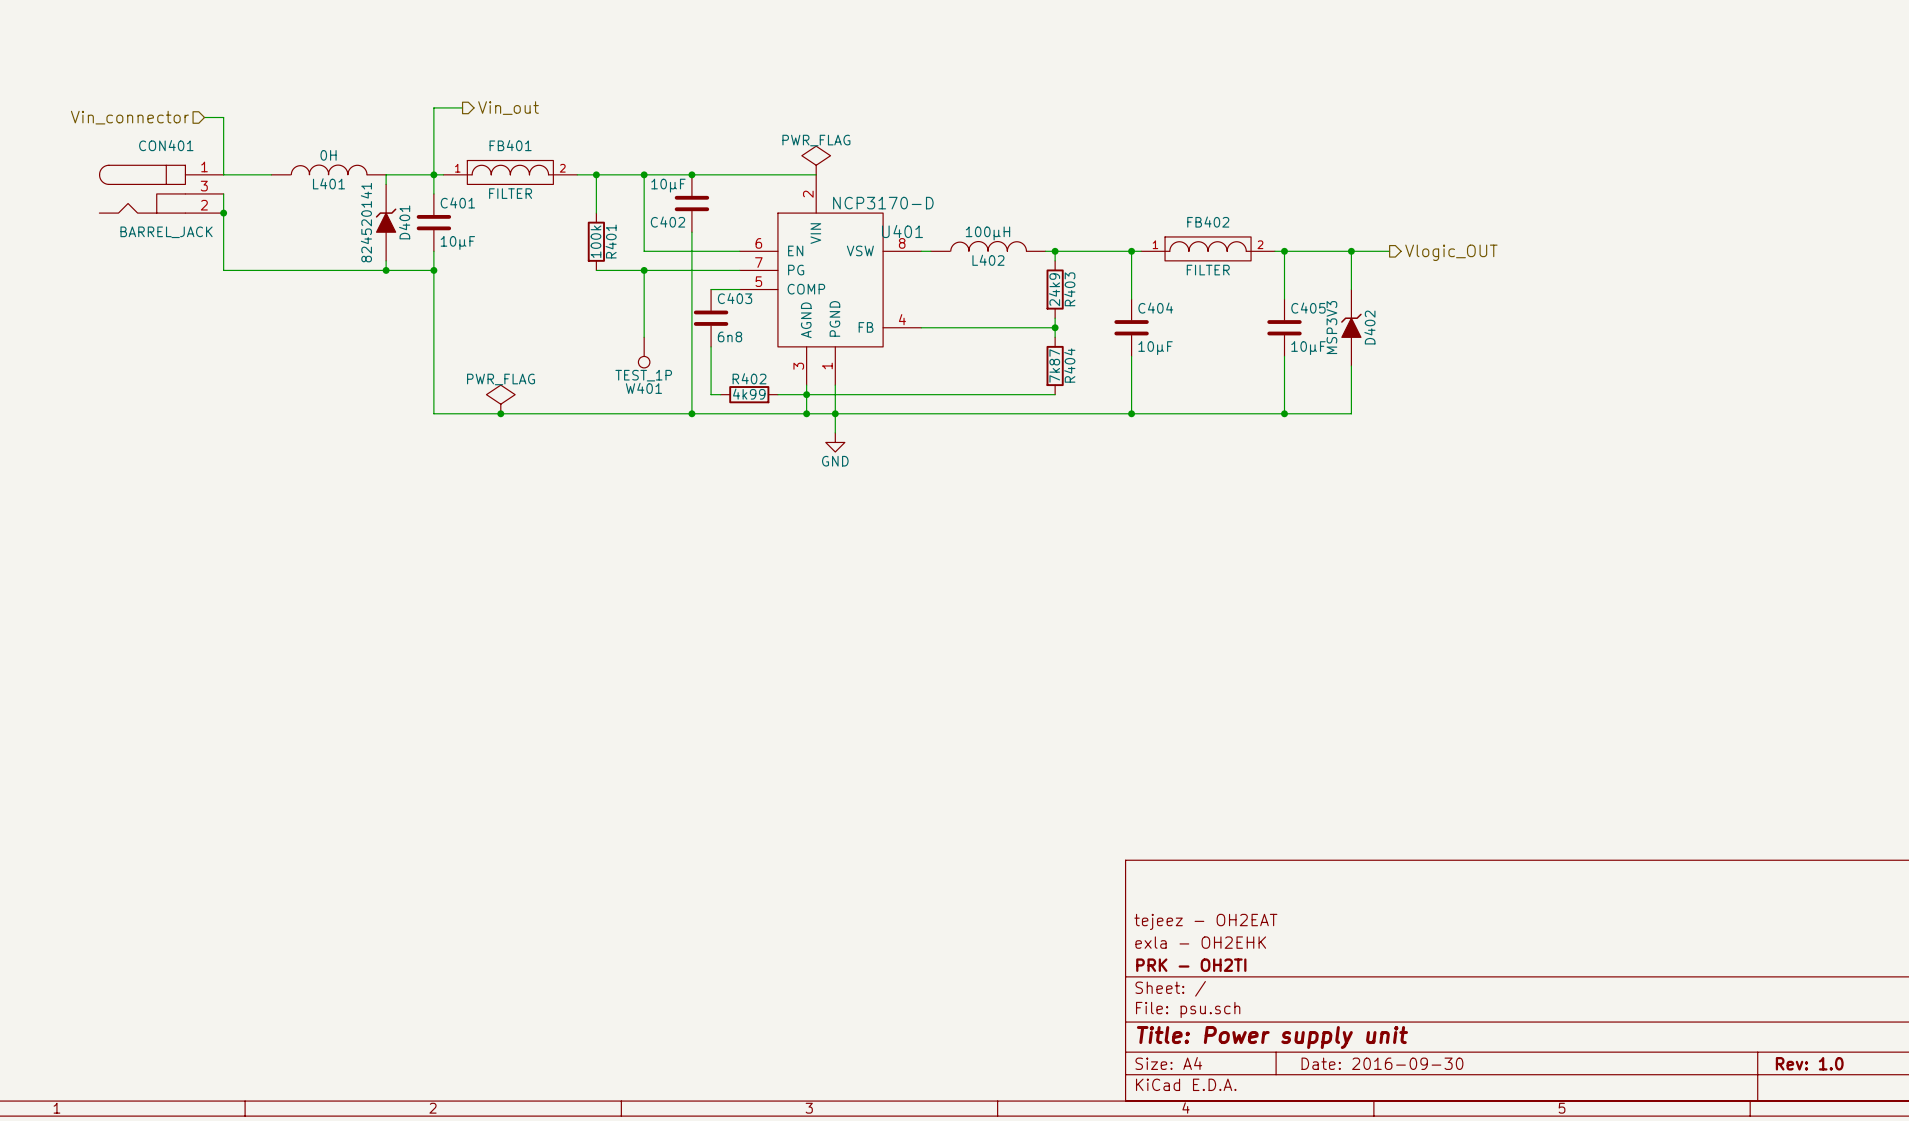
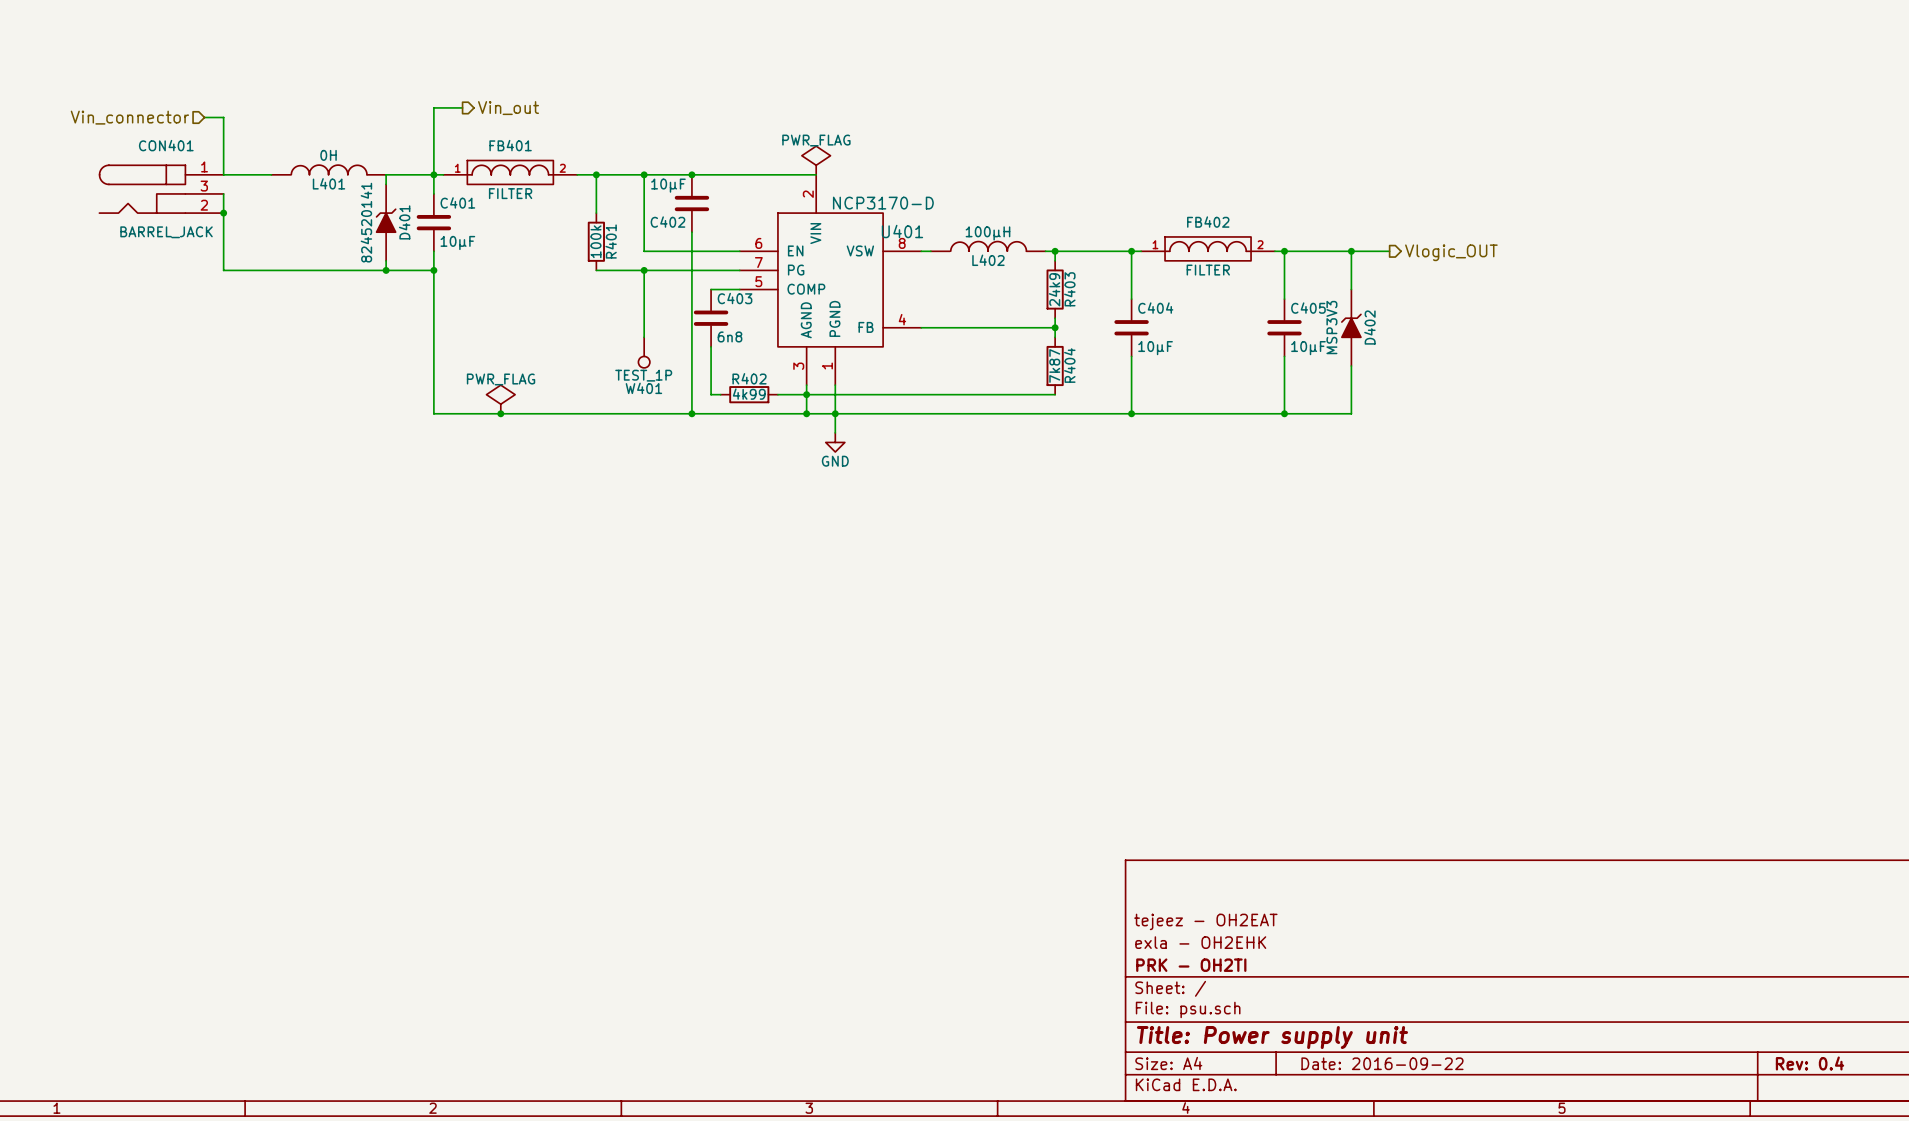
title block: Date: 2016-09-30 (1382, 1063) -> Date: 2016-09-22 (1382, 1063)
title block: Rev: 1.0 (1809, 1063) -> Rev: 0.4 (1809, 1063)

